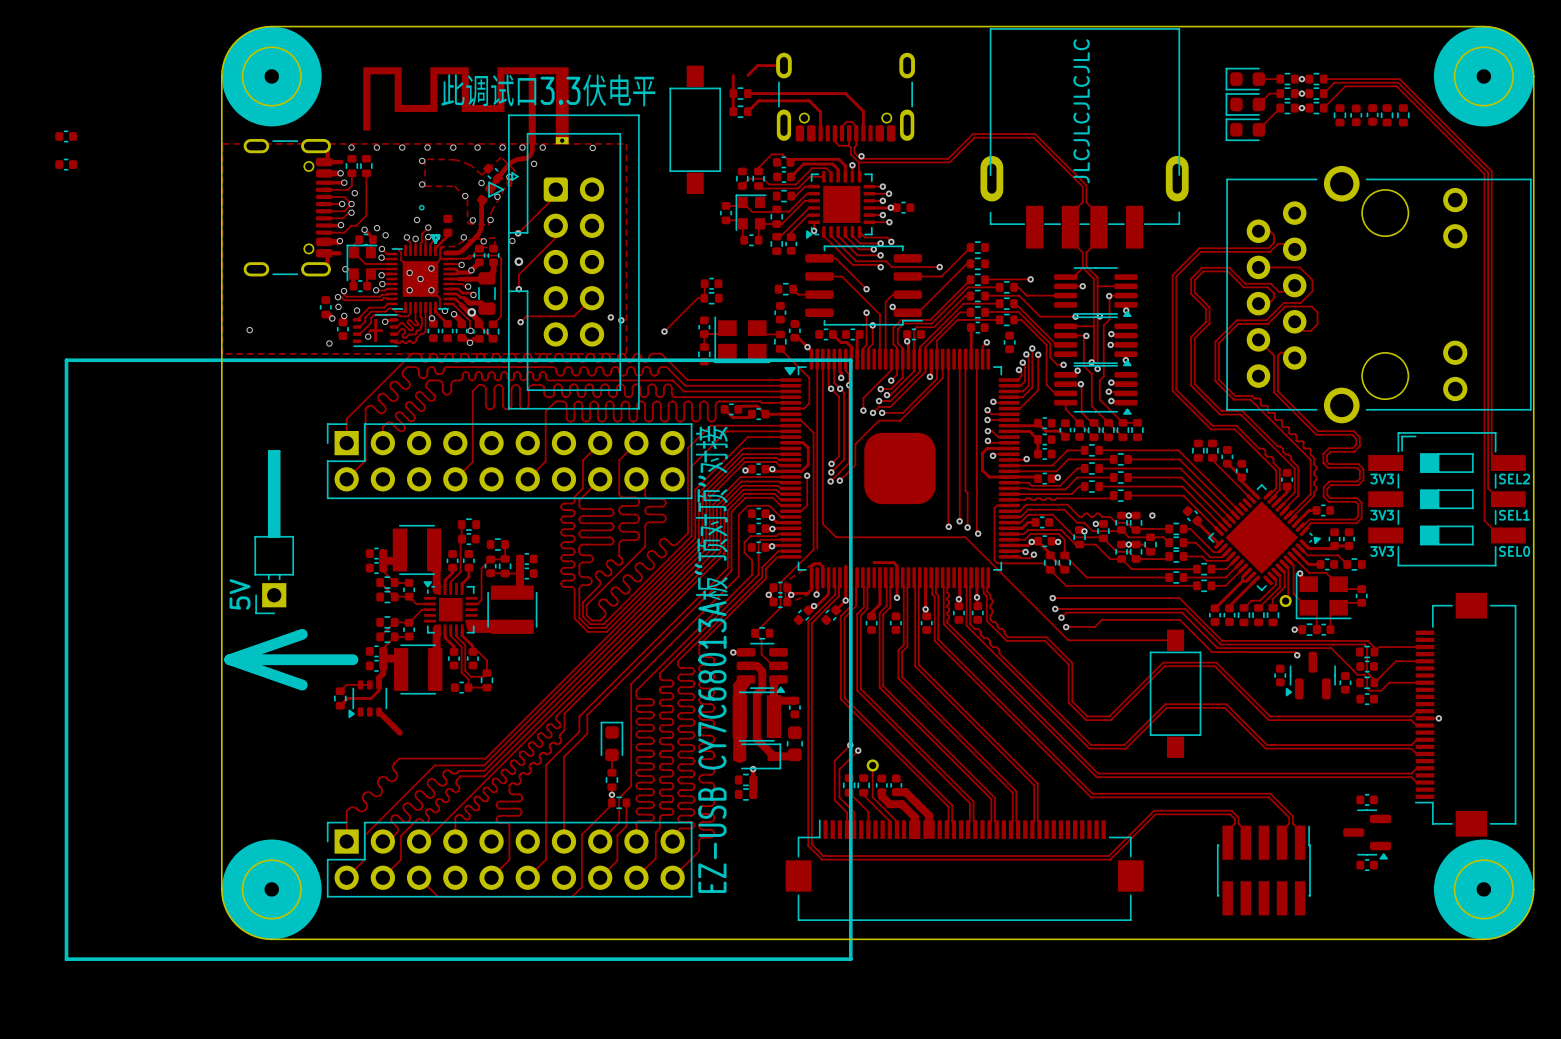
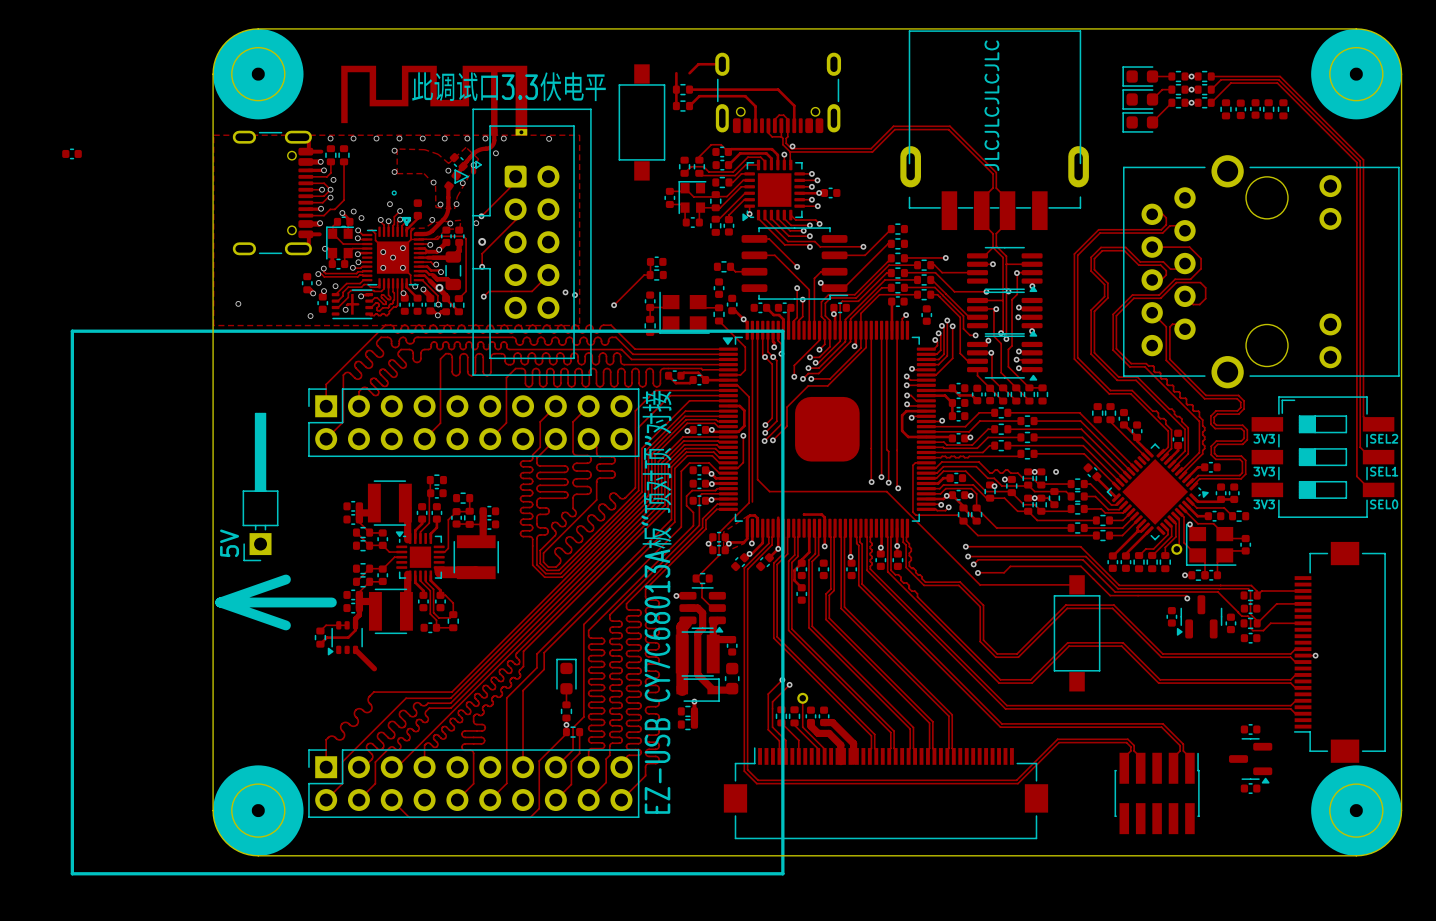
part: (66, 136) -> none
track: none -> (801, 563) (794, 570) (794, 580) (801, 587)
part: none -> (801, 593)

